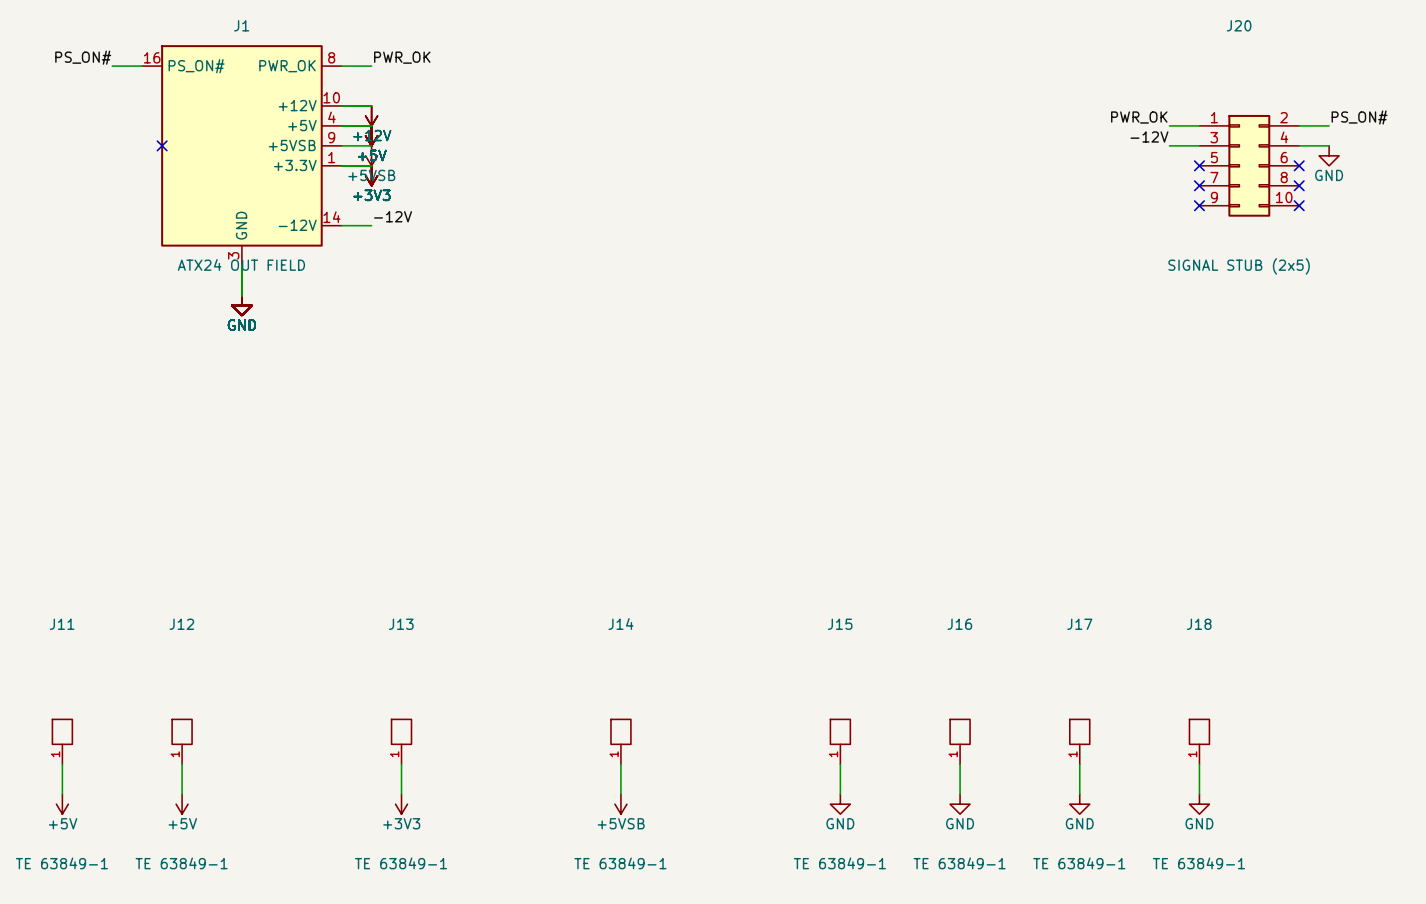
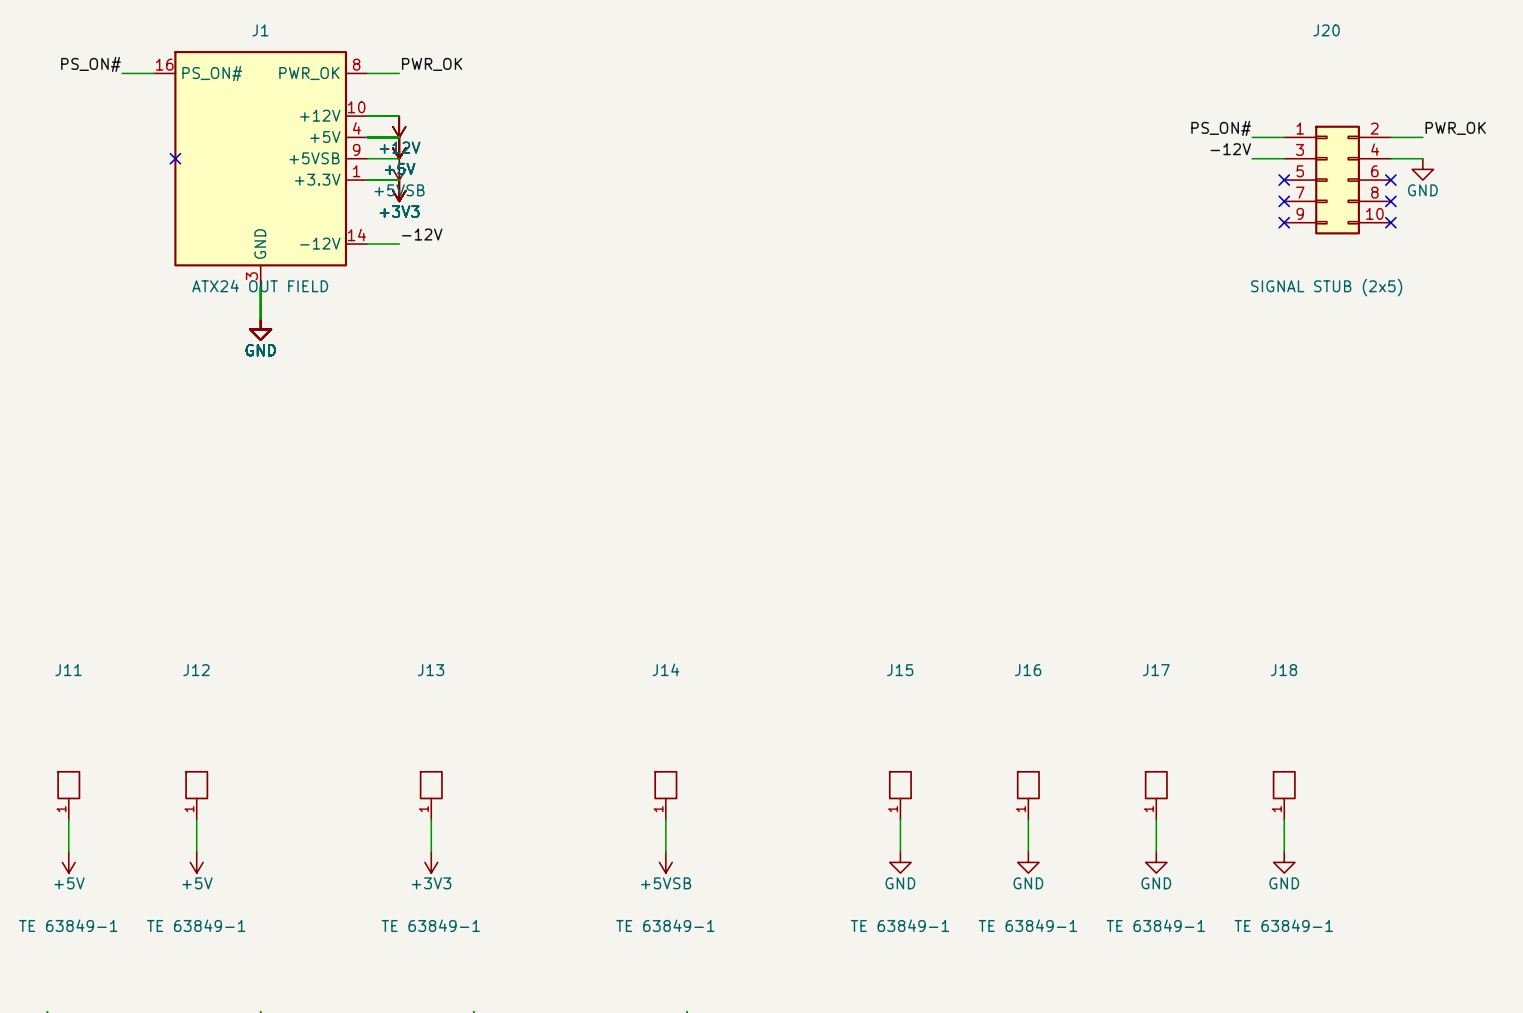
label: PWR_OK (1139, 117) -> PS_ON# (1221, 128)
label: PS_ON# (1359, 117) -> PWR_OK (1455, 128)

